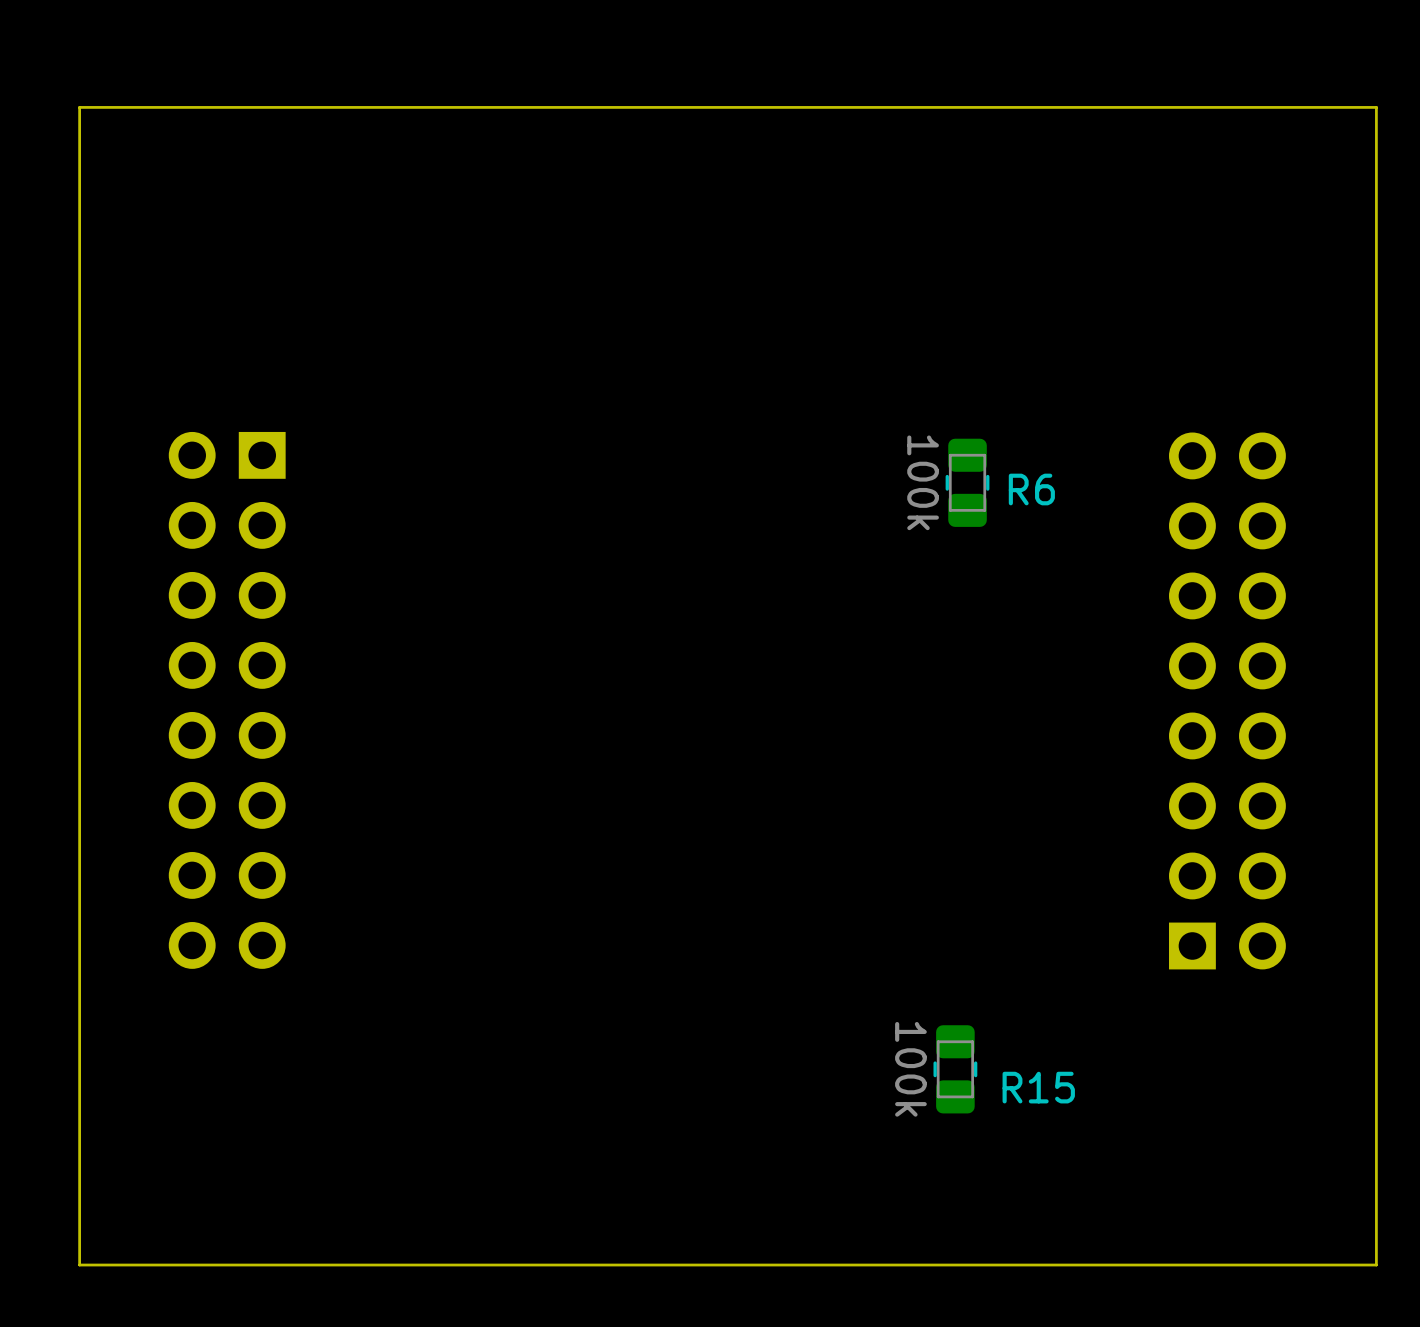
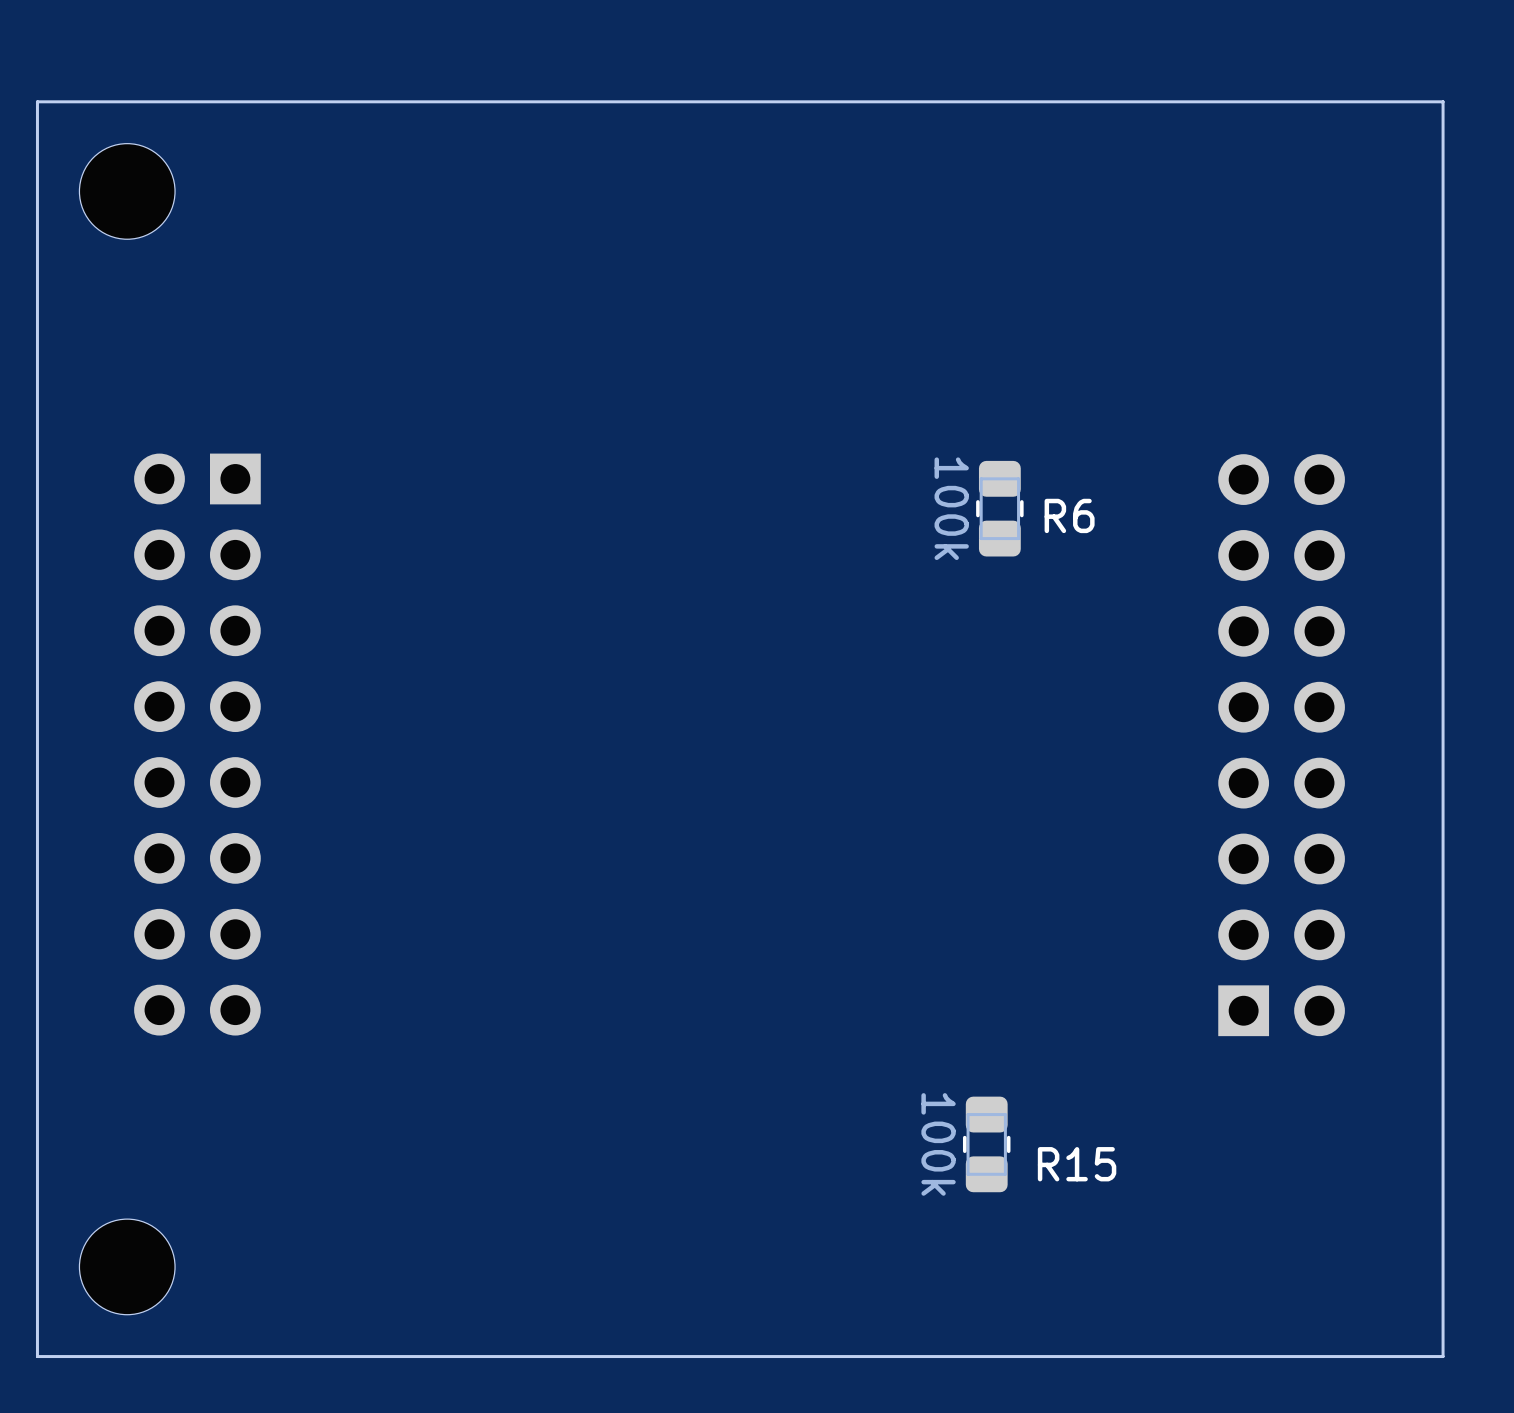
part: none -> (127, 191)
part: none -> (127, 1266)

